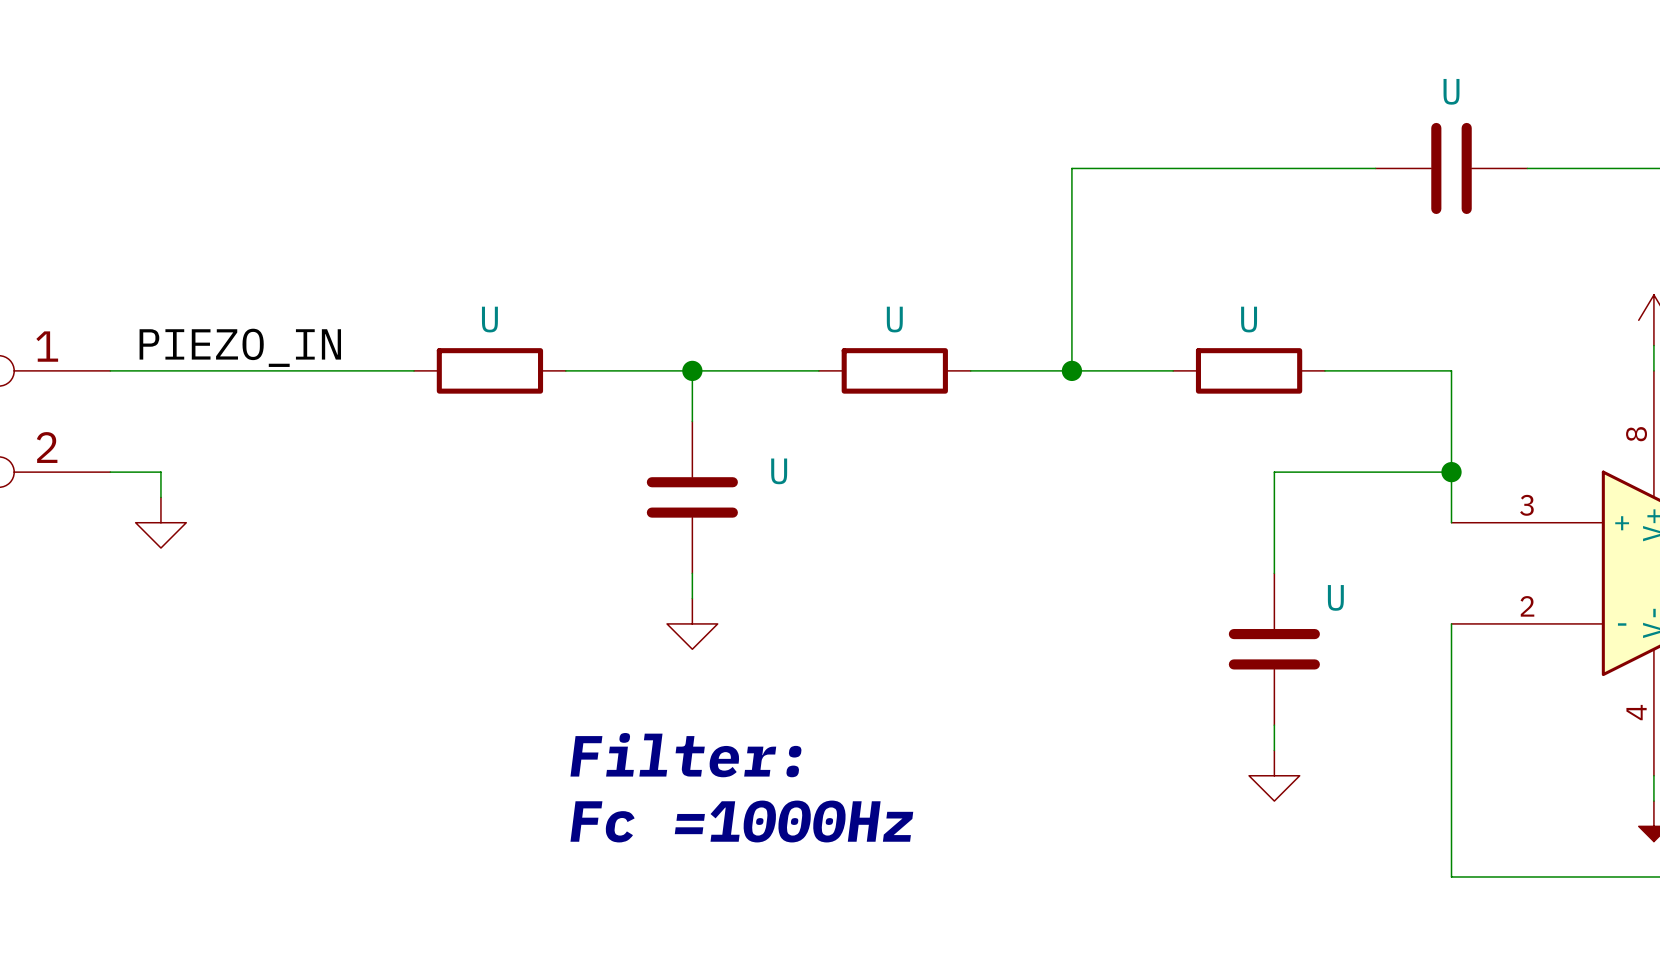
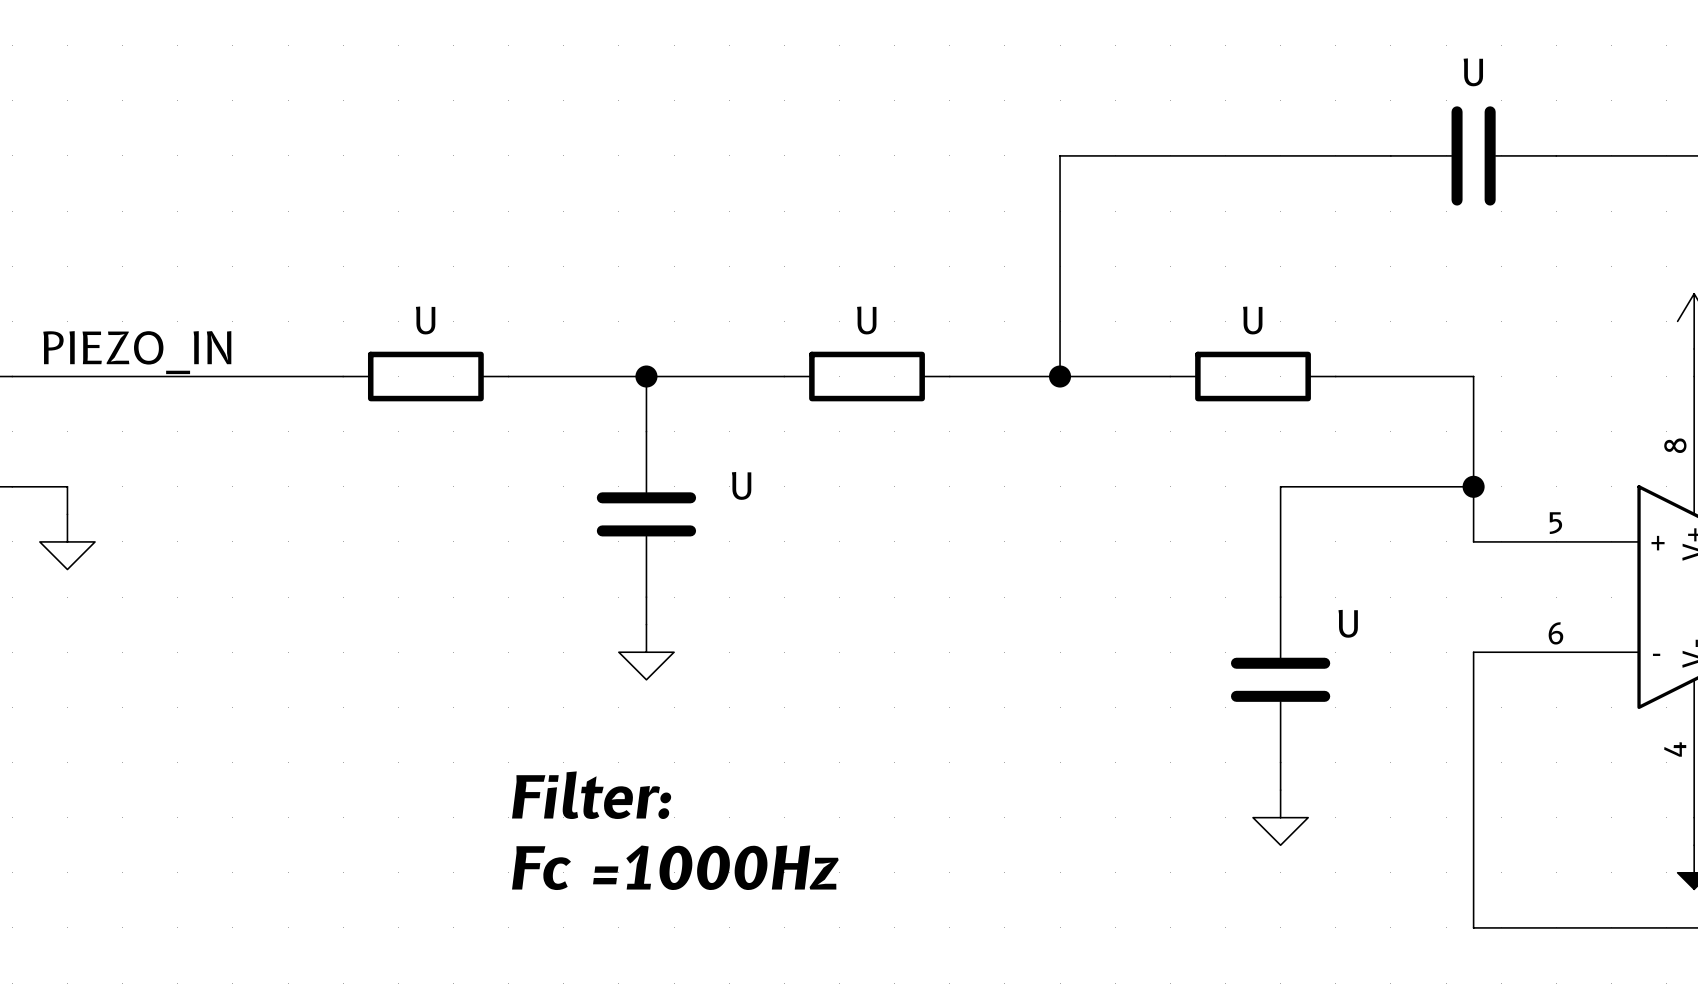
part pin number: 3 (1526, 505) -> 5 (1555, 523)
part pin number: 2 (1527, 606) -> 6 (1555, 633)

